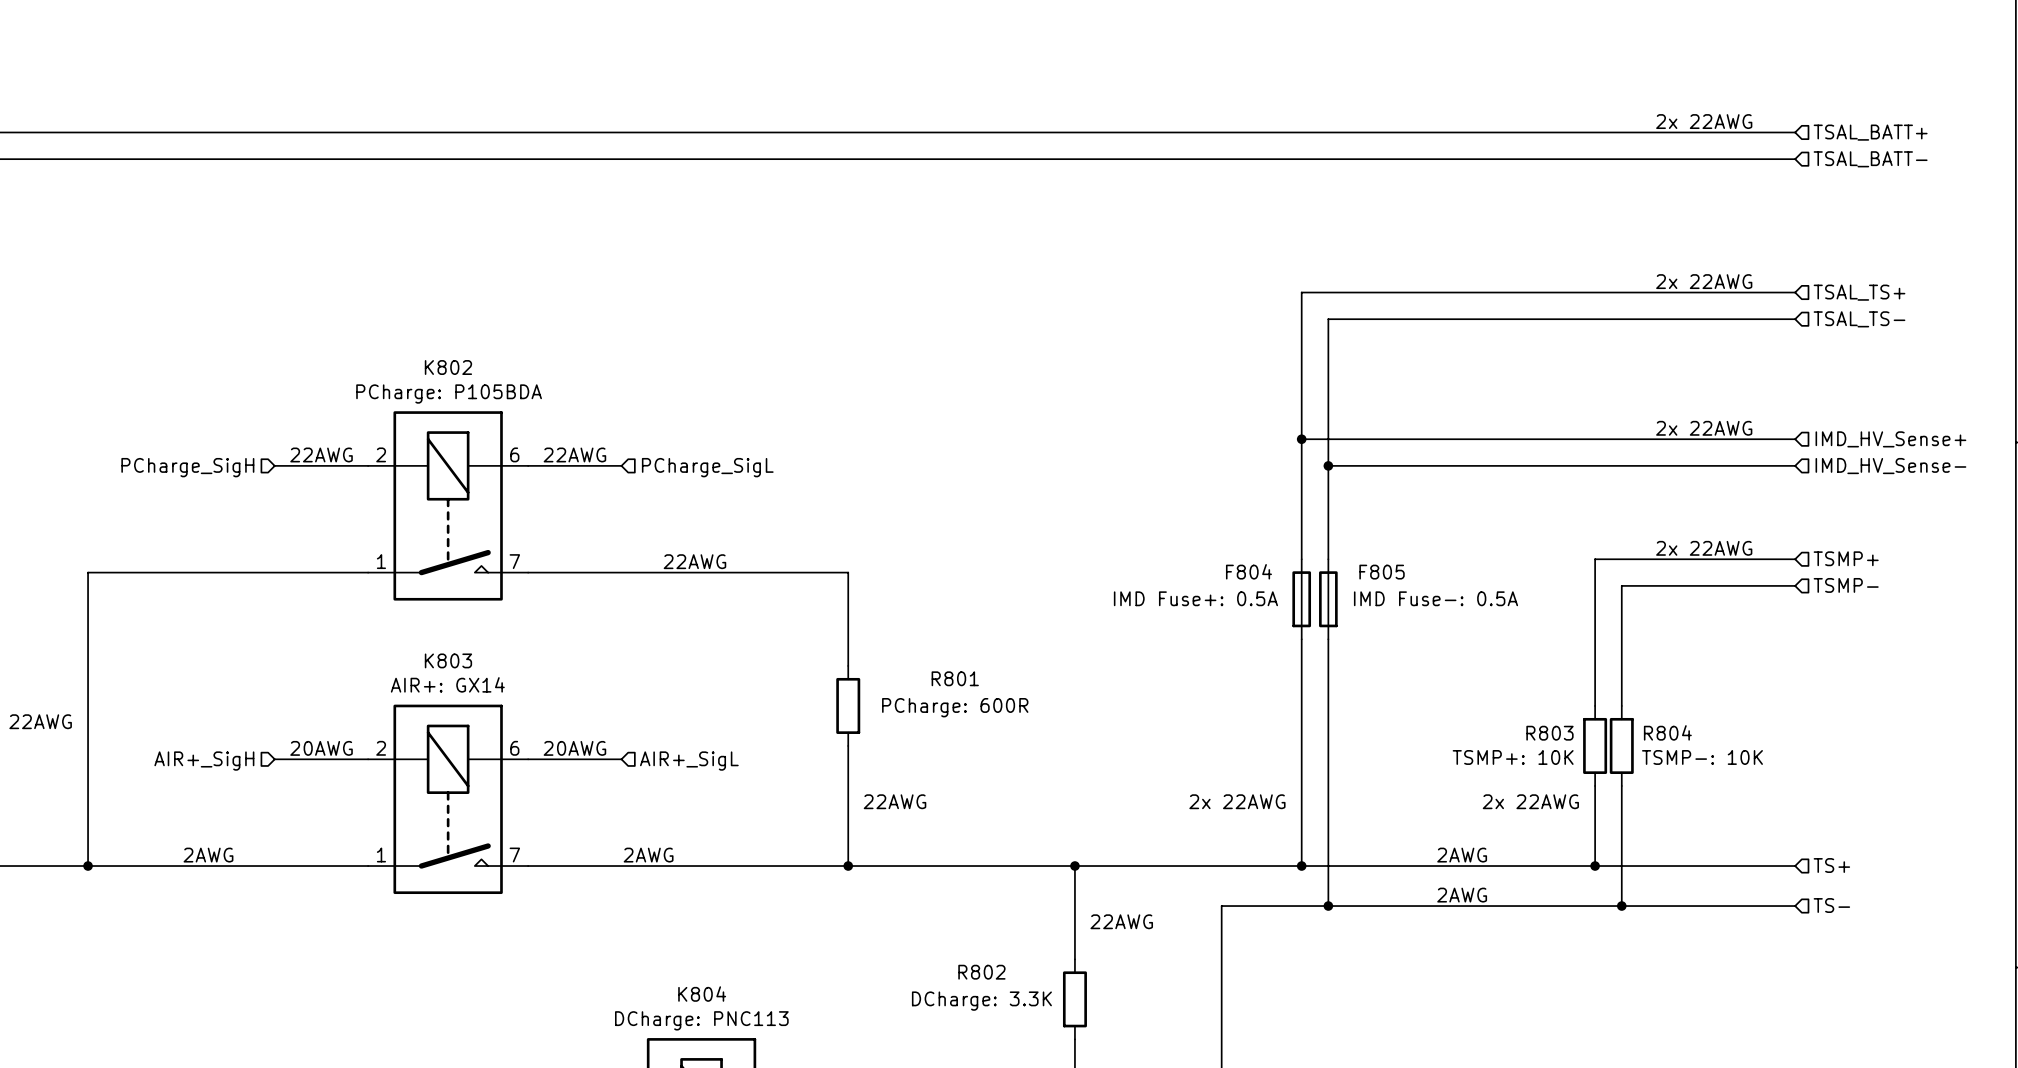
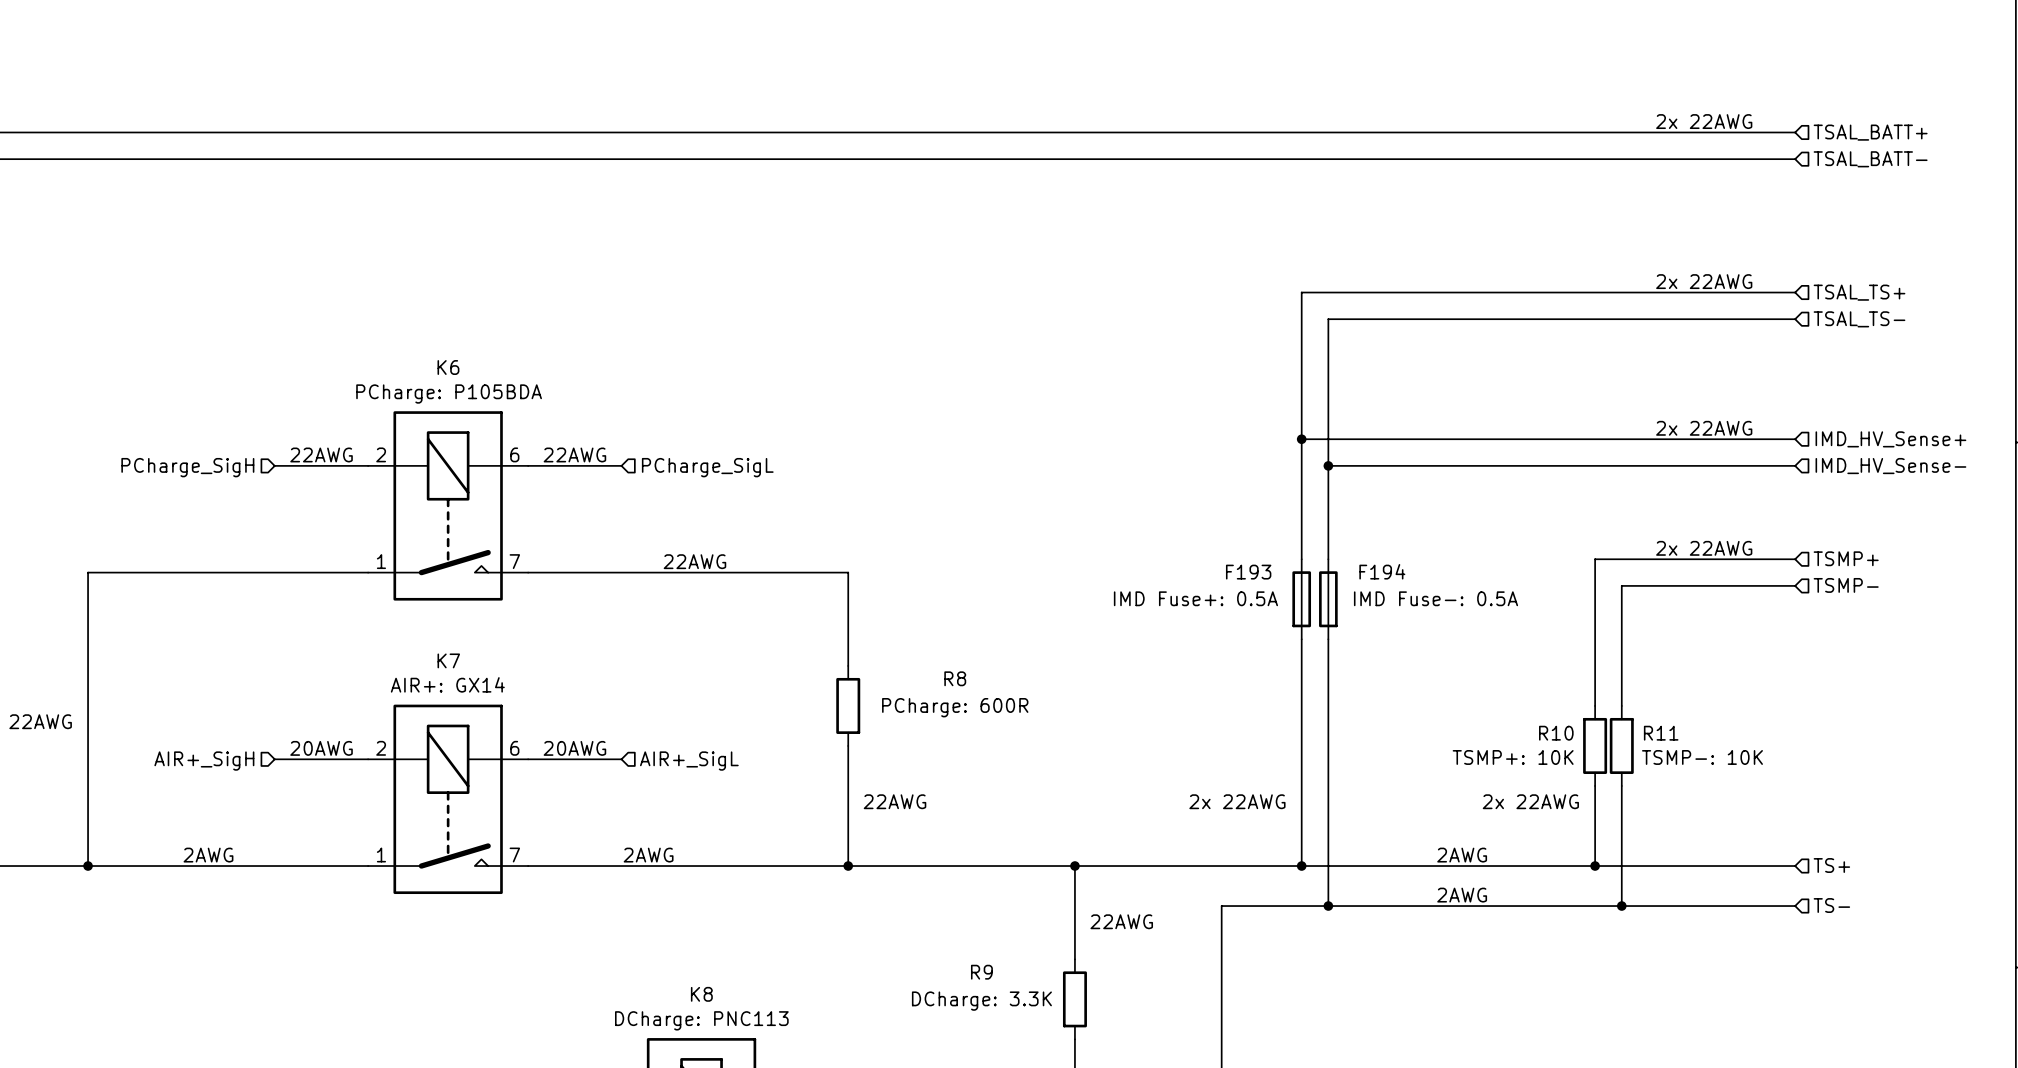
K802 name: K802 (448, 367) -> K6 (448, 367)
F804 name: F804 (1248, 571) -> F193 (1248, 572)
F805 name: F805 (1382, 572) -> F194 (1382, 571)
K803 name: K803 (448, 660) -> K7 (448, 660)
R801 name: R801 (955, 678) -> R8 (955, 678)
R804 name: R804 (1667, 732) -> R11 (1661, 733)
R803 name: R803 (1549, 733) -> R10 (1556, 733)
R802 name: R802 (981, 972) -> R9 (981, 972)
K804 name: K804 (702, 994) -> K8 (701, 994)

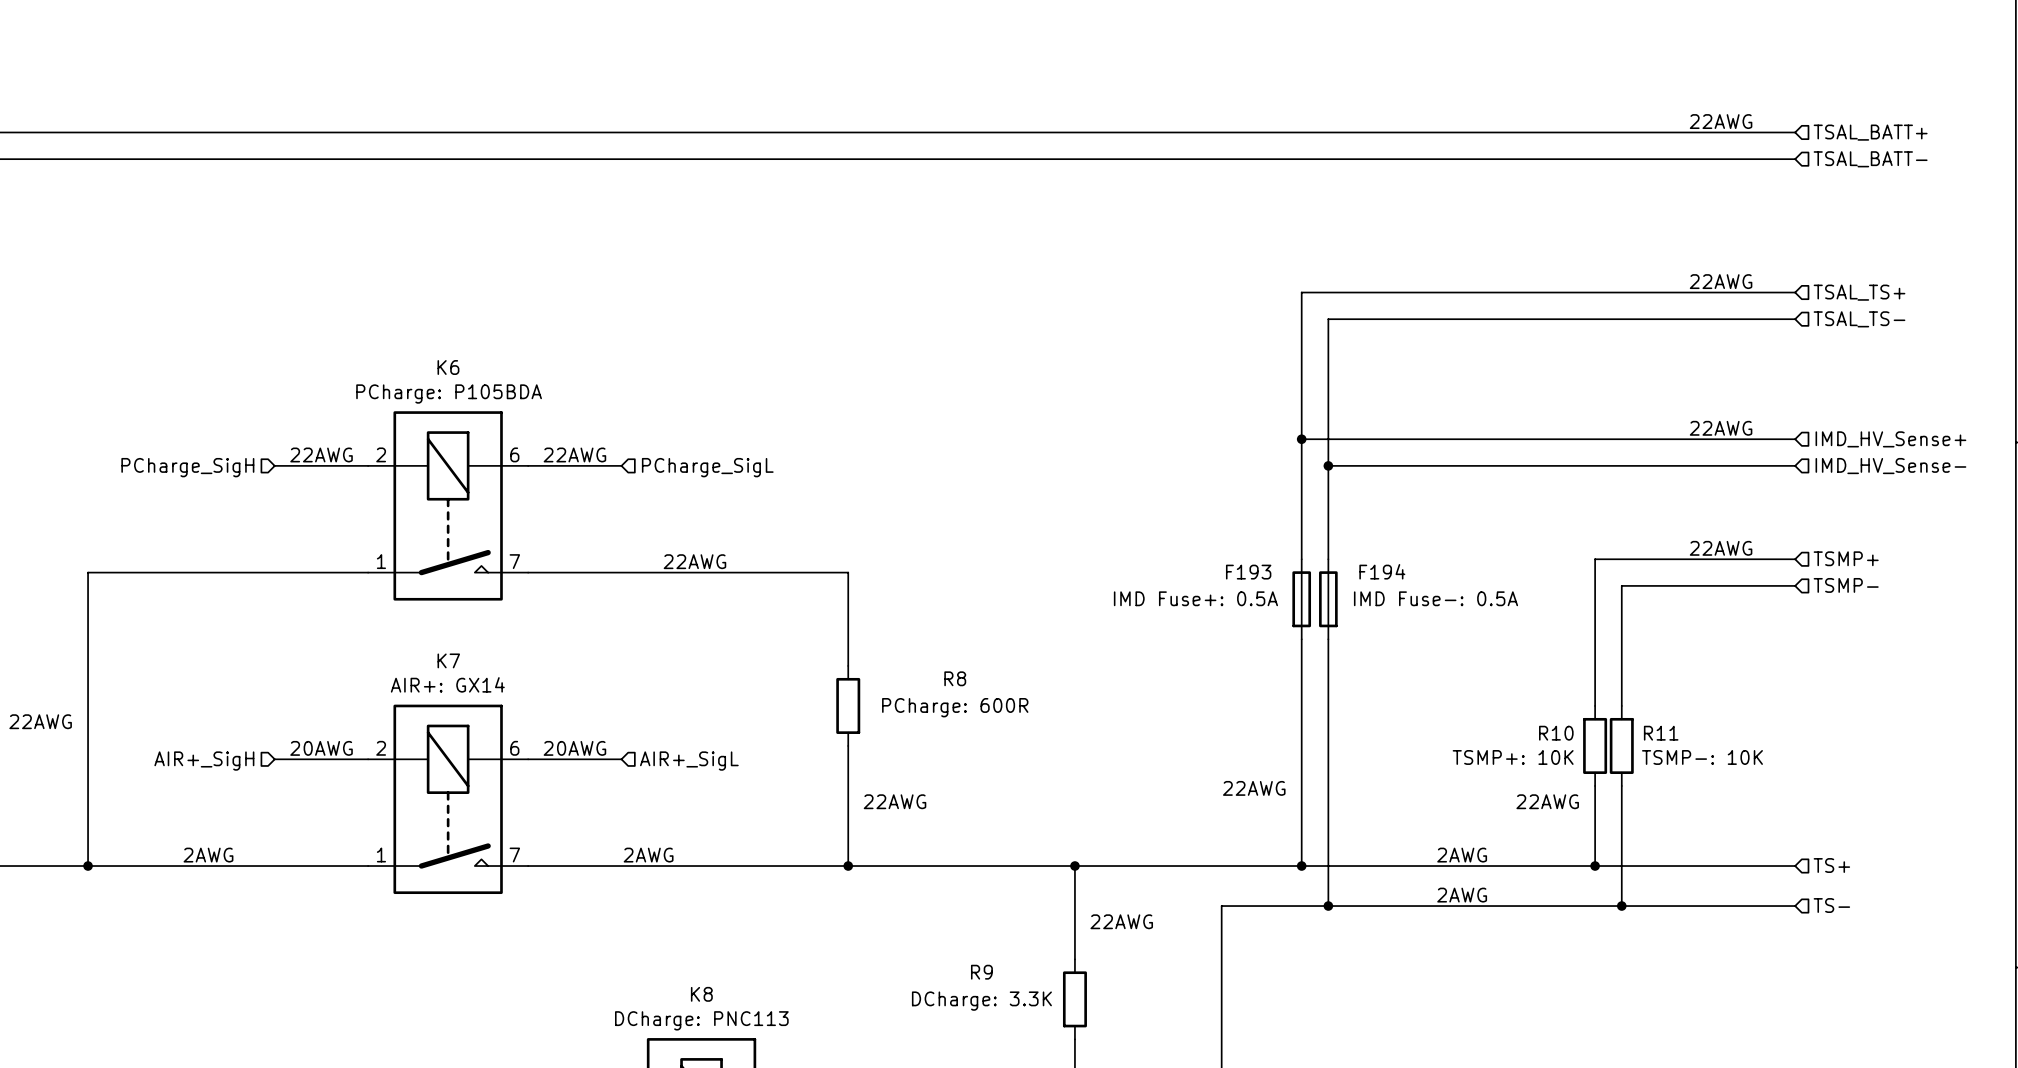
text: 2x 22AWG (1704, 121) -> 22AWG (1721, 121)
text: 2x 22AWG (1704, 281) -> 22AWG (1721, 281)
text: 2x 22AWG (1704, 428) -> 22AWG (1721, 428)
text: 2x 22AWG (1704, 548) -> 22AWG (1721, 548)
text: 2x 22AWG (1237, 801) -> 22AWG (1254, 788)
text: 2x 22AWG (1530, 801) -> 22AWG (1547, 801)

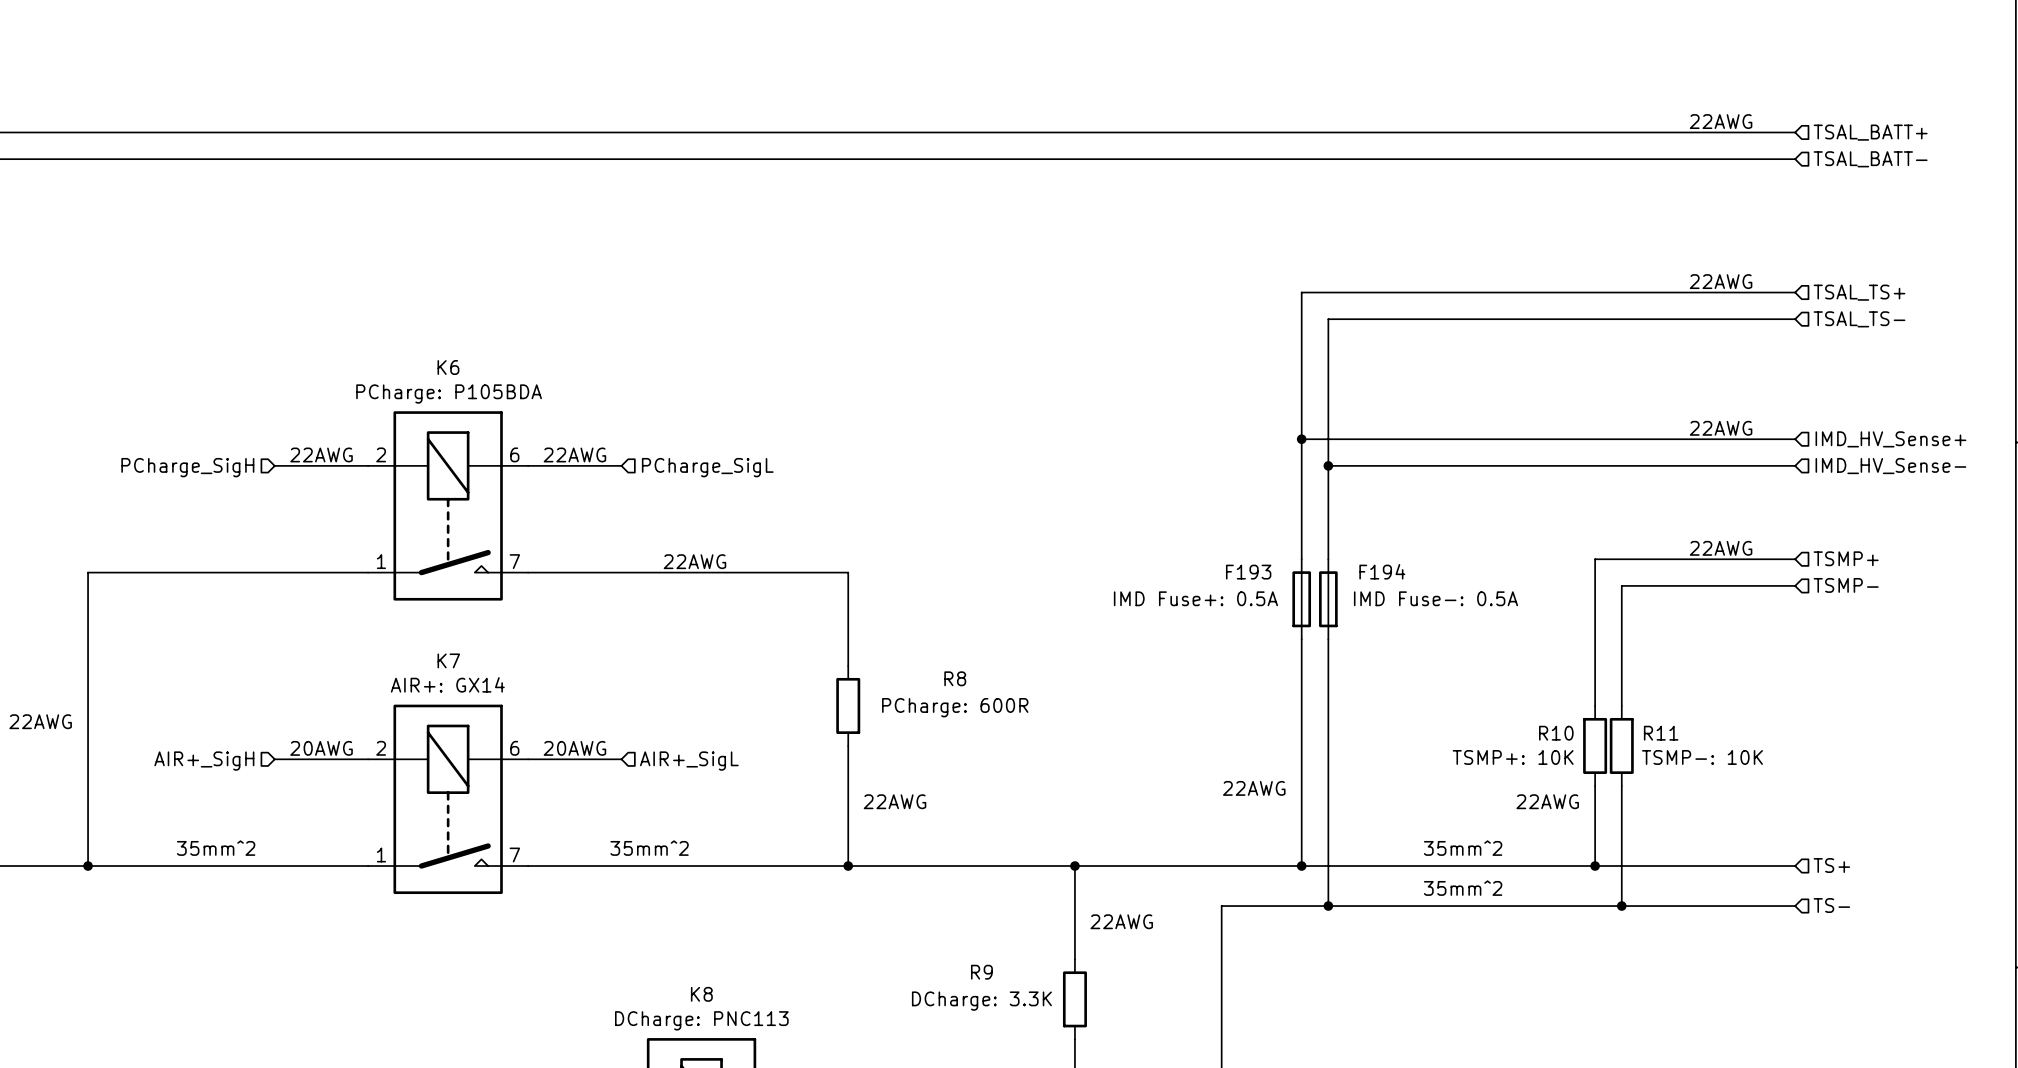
text: none -> 35mm^2 (649, 848)
text: none -> 35mm^2 (1463, 848)
text: 2AWG (208, 855) -> 35mm^2 (216, 848)
text: 2AWG (648, 855) -> none
text: 2AWG (1462, 855) -> none
text: none -> 35mm^2 (1463, 888)
text: 2AWG (1462, 895) -> none

